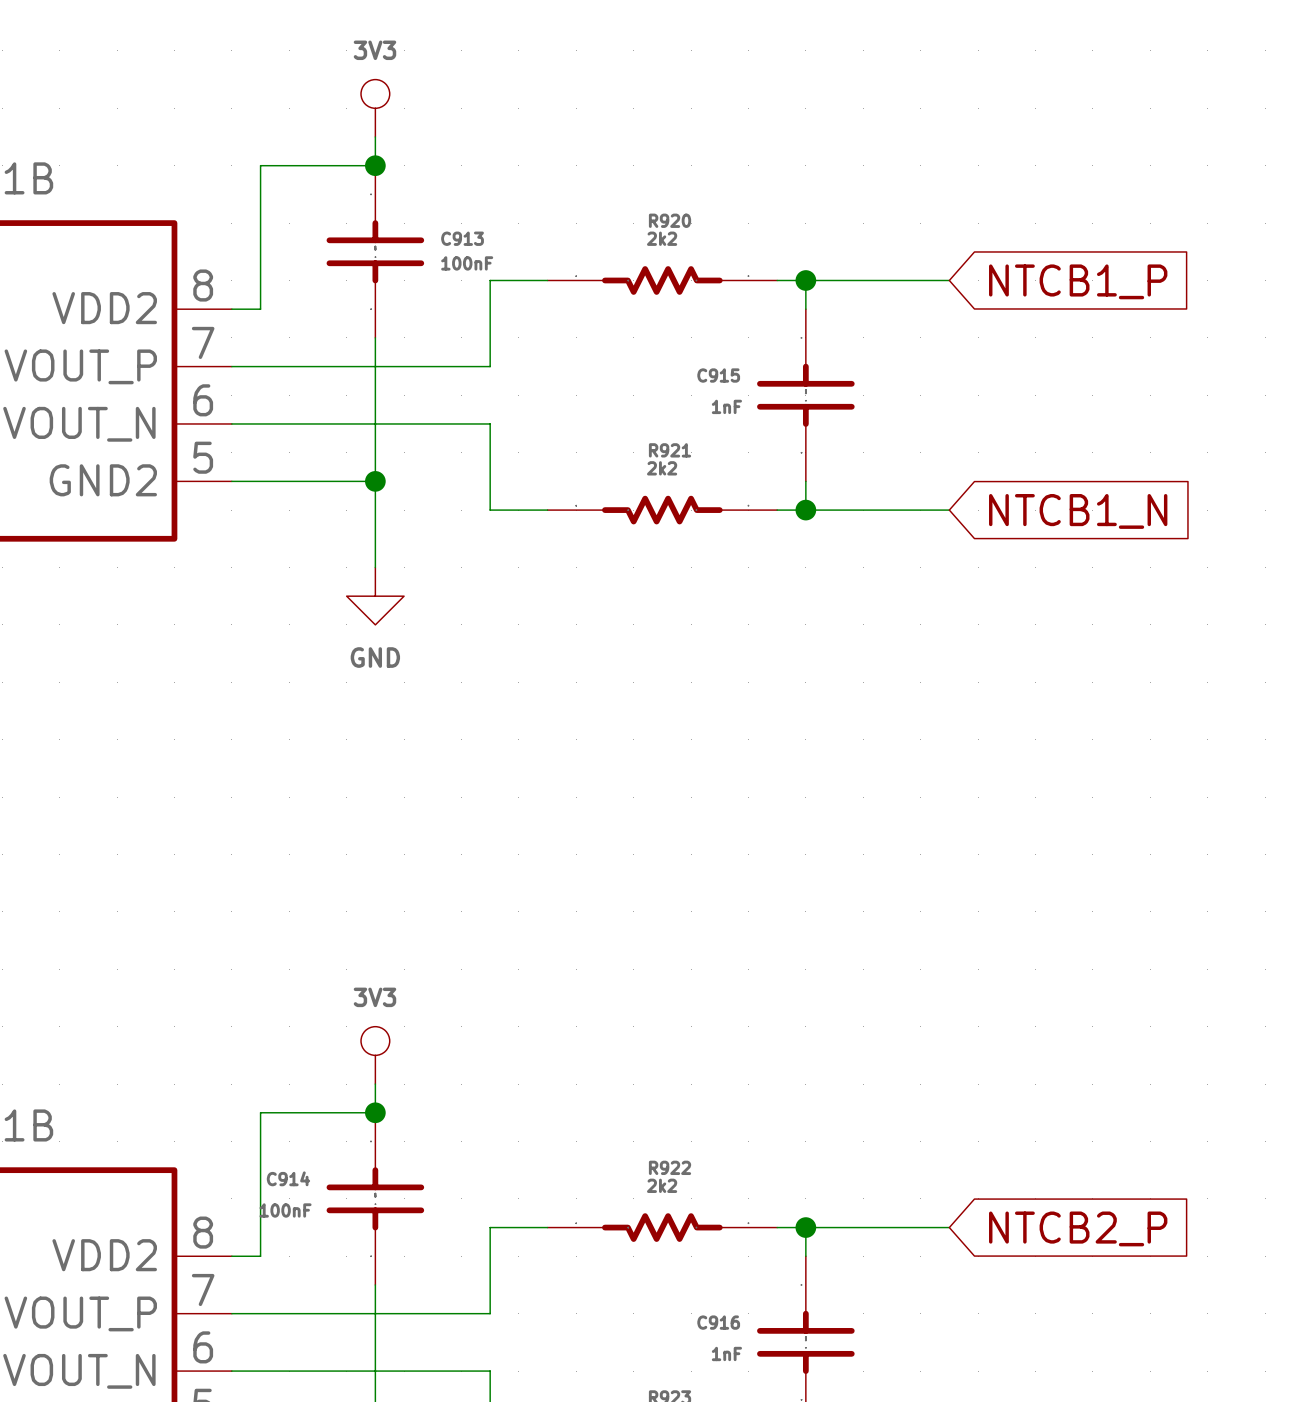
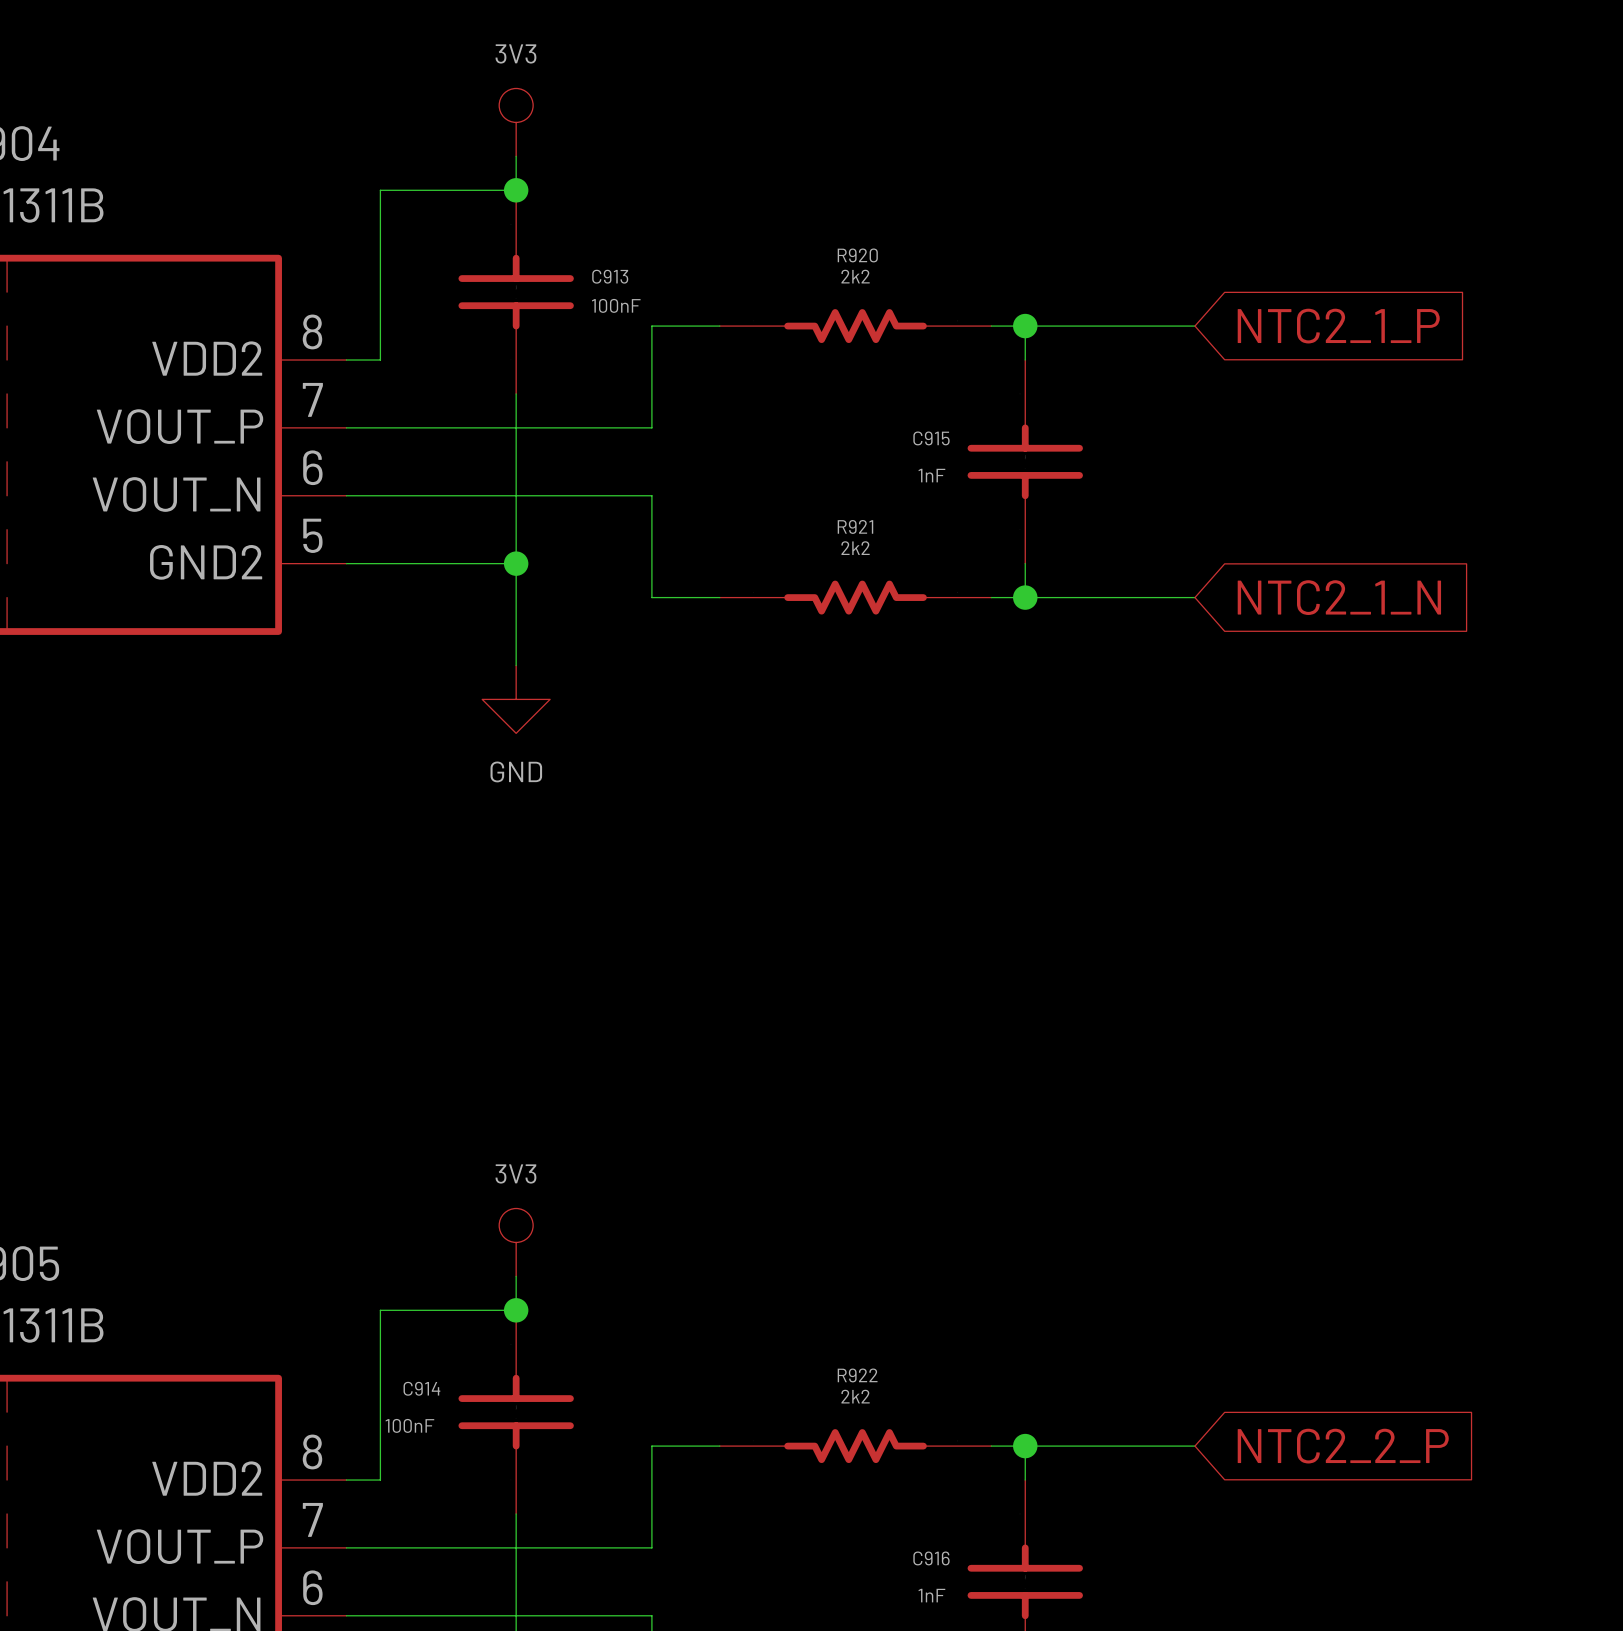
global label: NTCB1_P (1078, 281) -> NTC2_1_P (1338, 326)
global label: NTCB1_N (1078, 511) -> NTC2_1_N (1339, 597)
global label: NTCB2_P (1078, 1228) -> NTC2_2_P (1343, 1446)

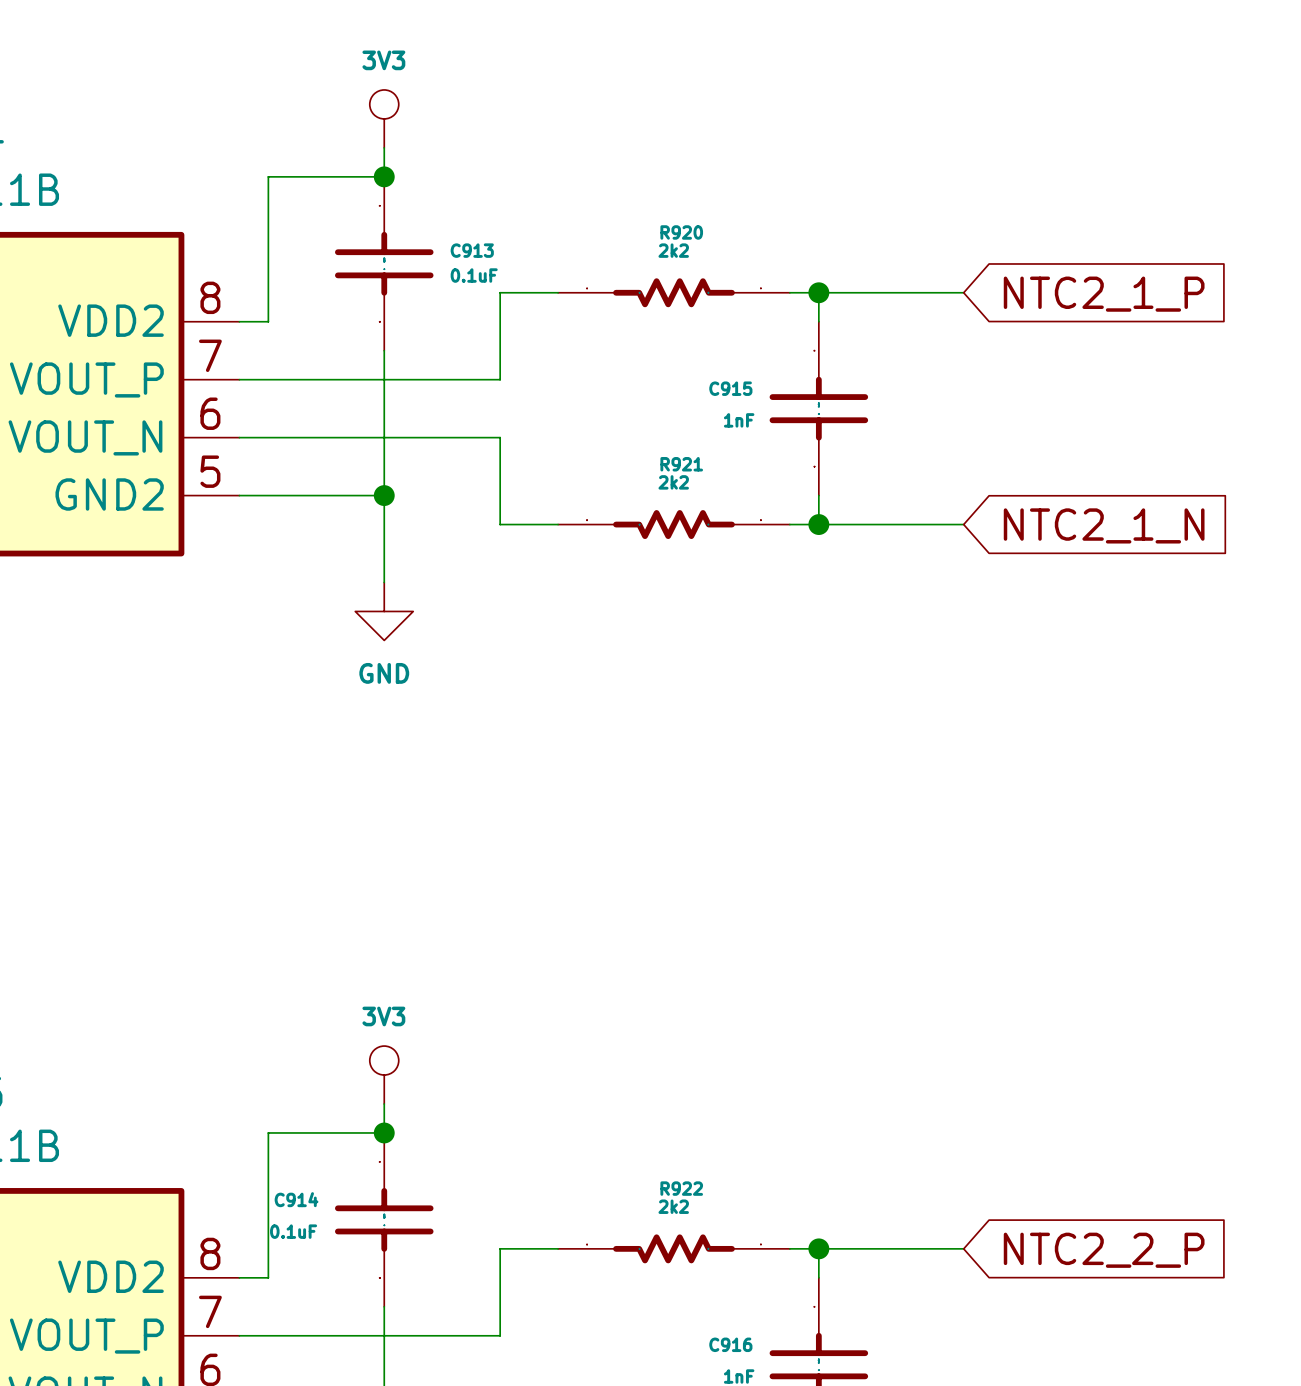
C913 value: 100nF (616, 305) -> 0.1uF (474, 275)
C914 value: 100nF (409, 1425) -> 0.1uF (293, 1231)

